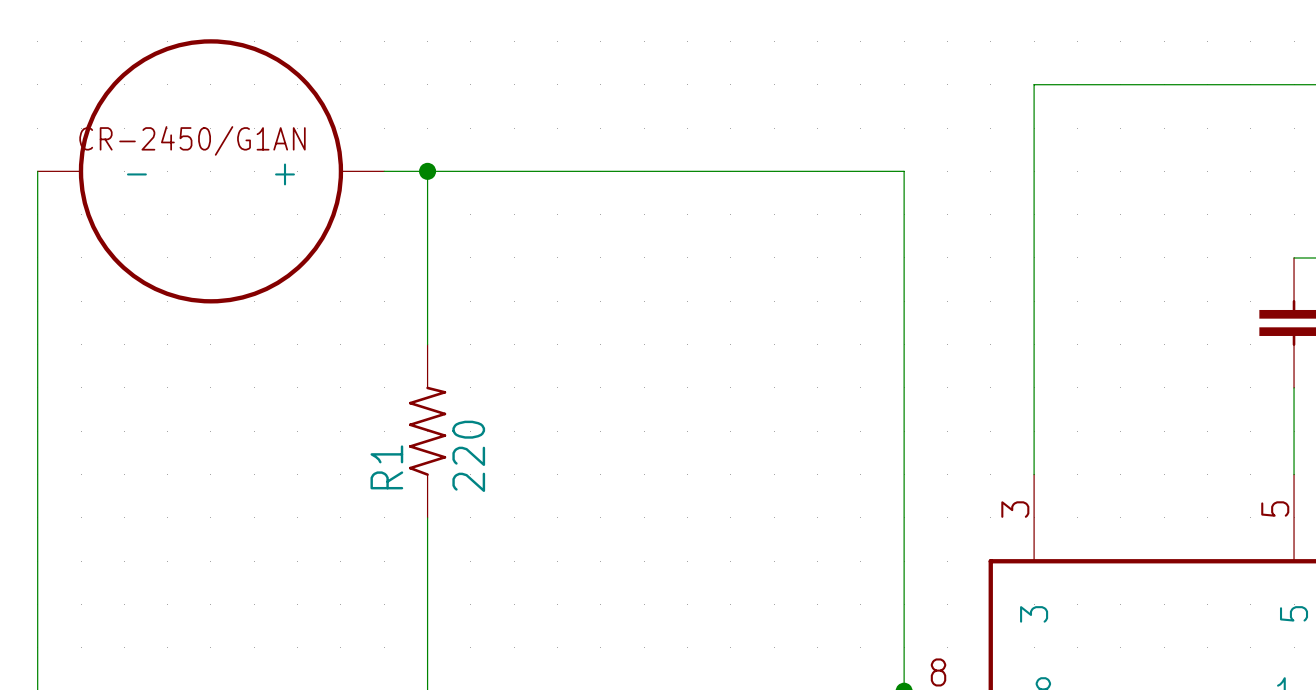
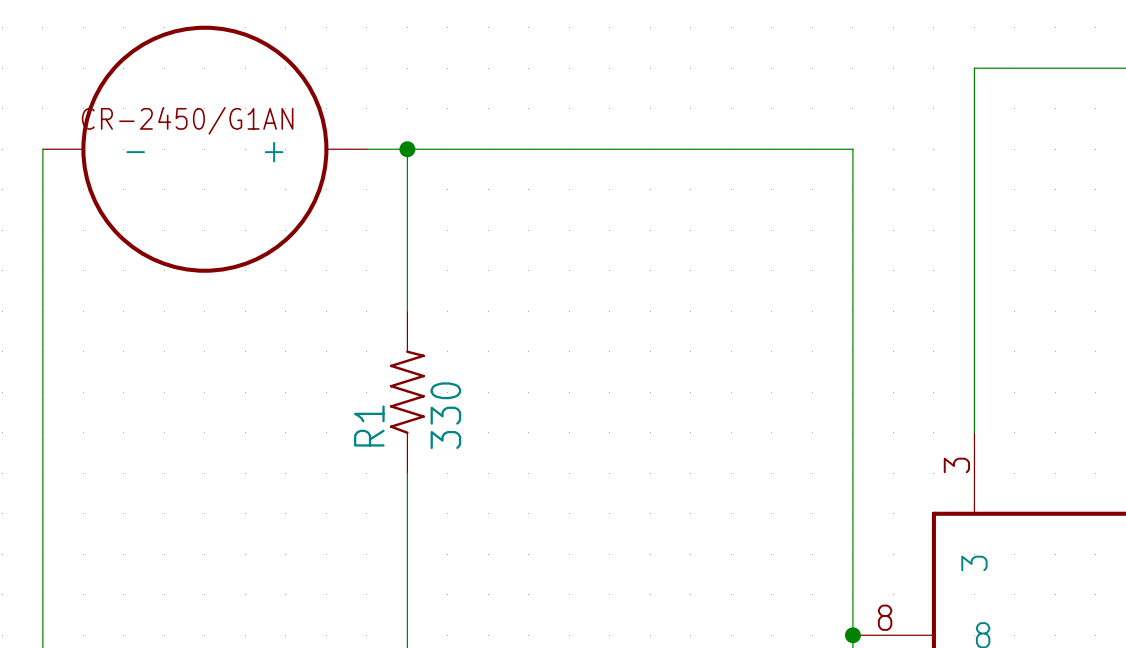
R1 value: 220 (468, 456) -> 330 (445, 415)

